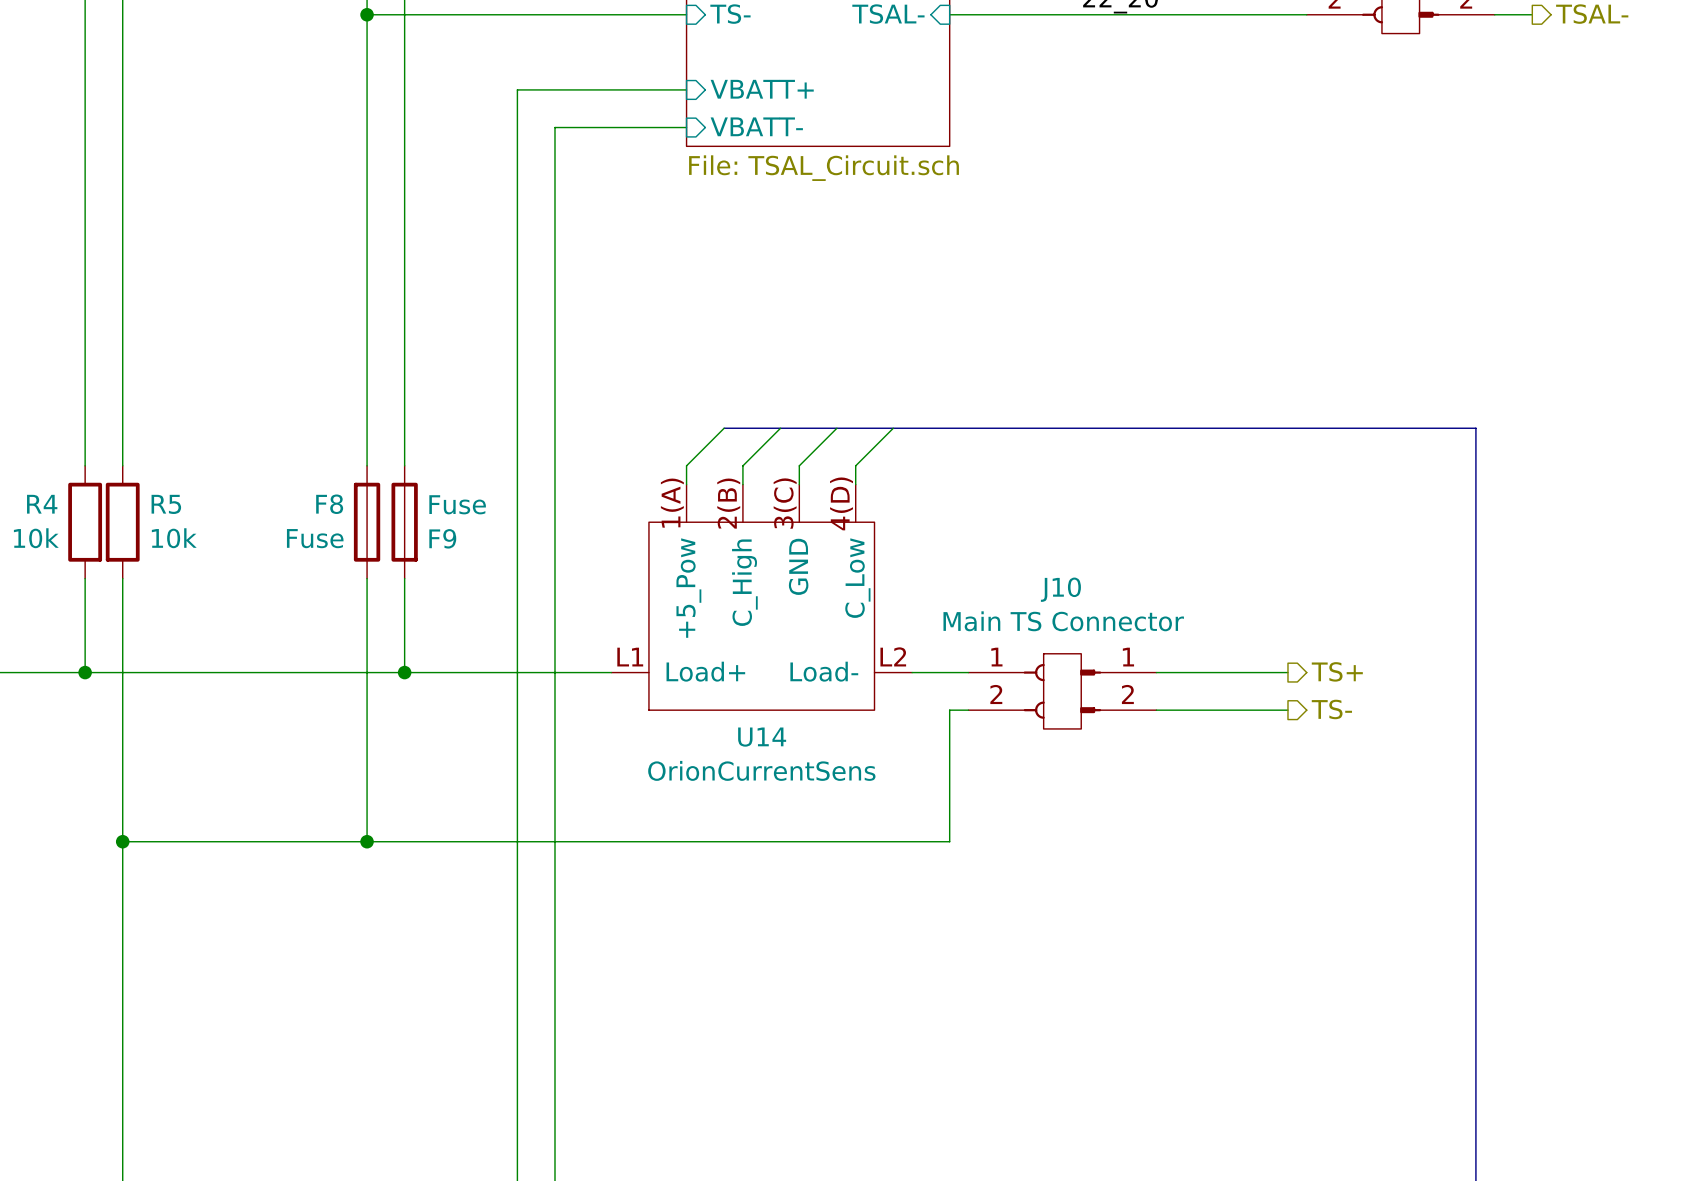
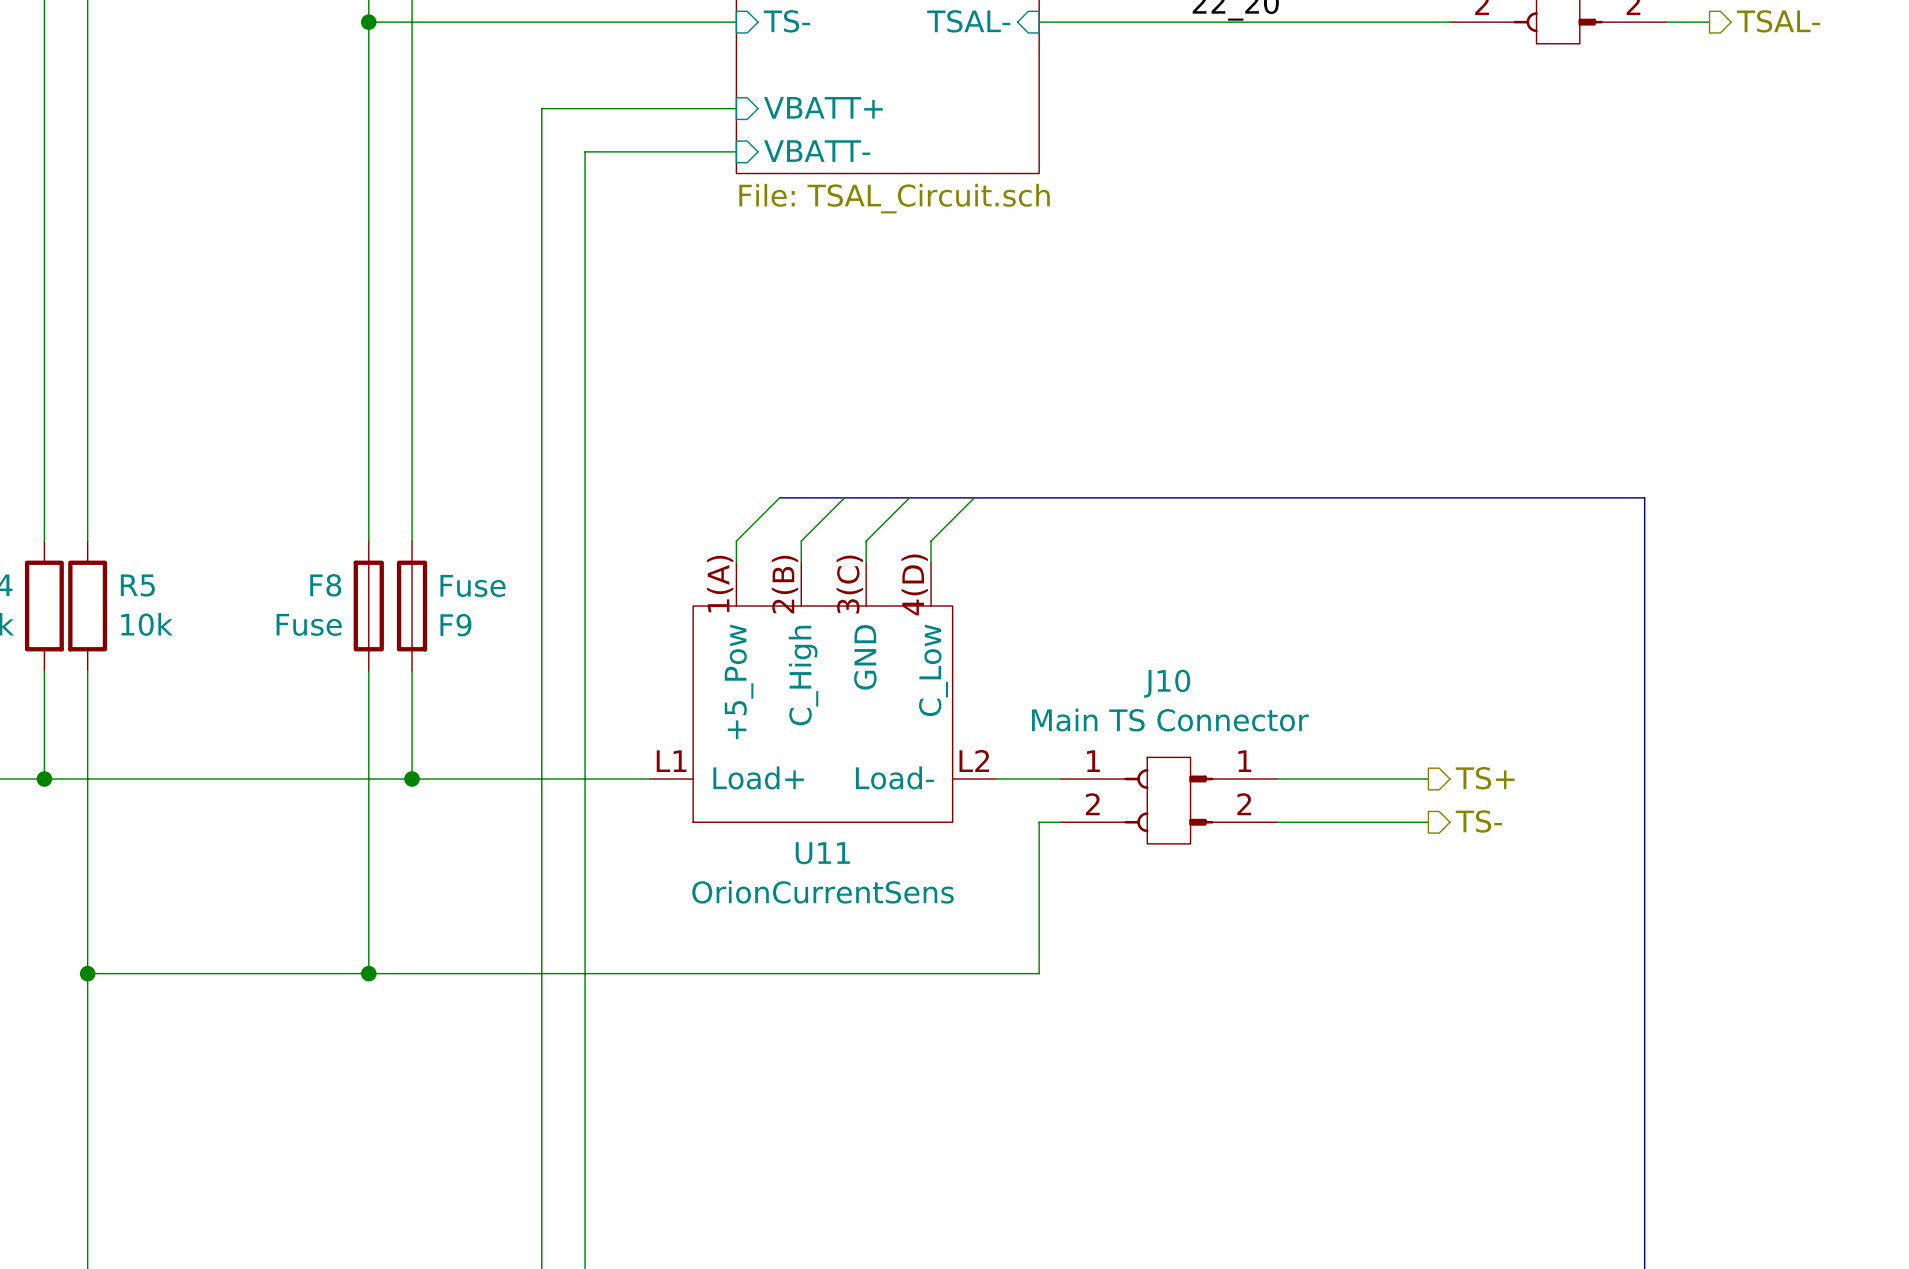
U14 name: U14 (762, 737) -> U11 (822, 853)

